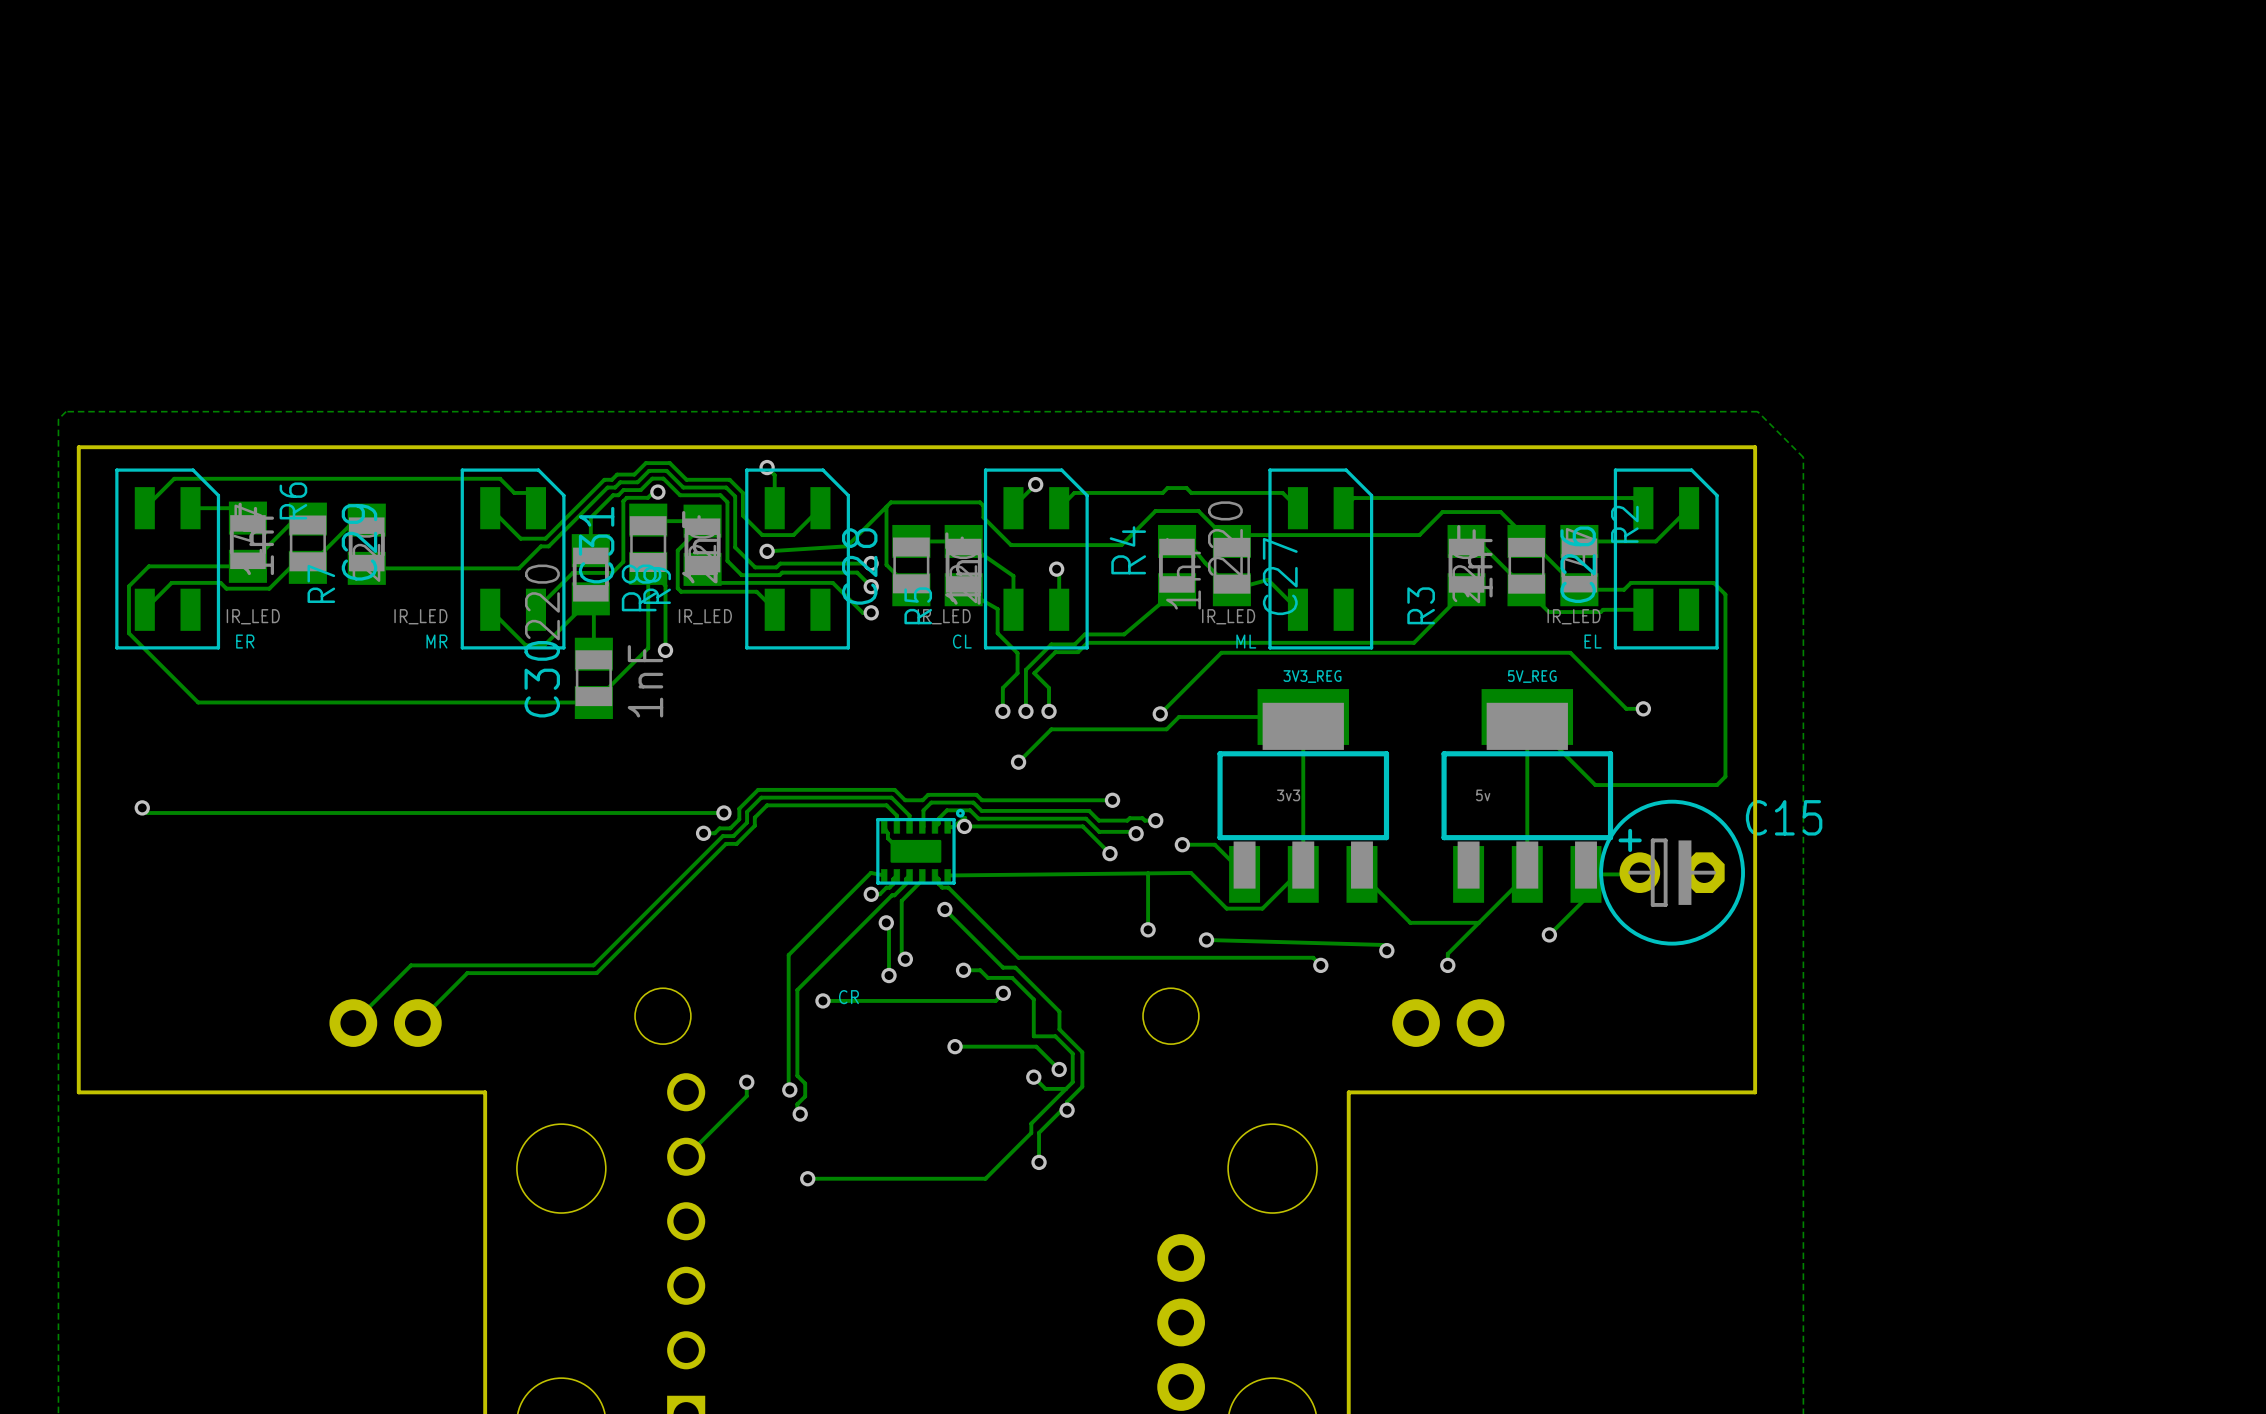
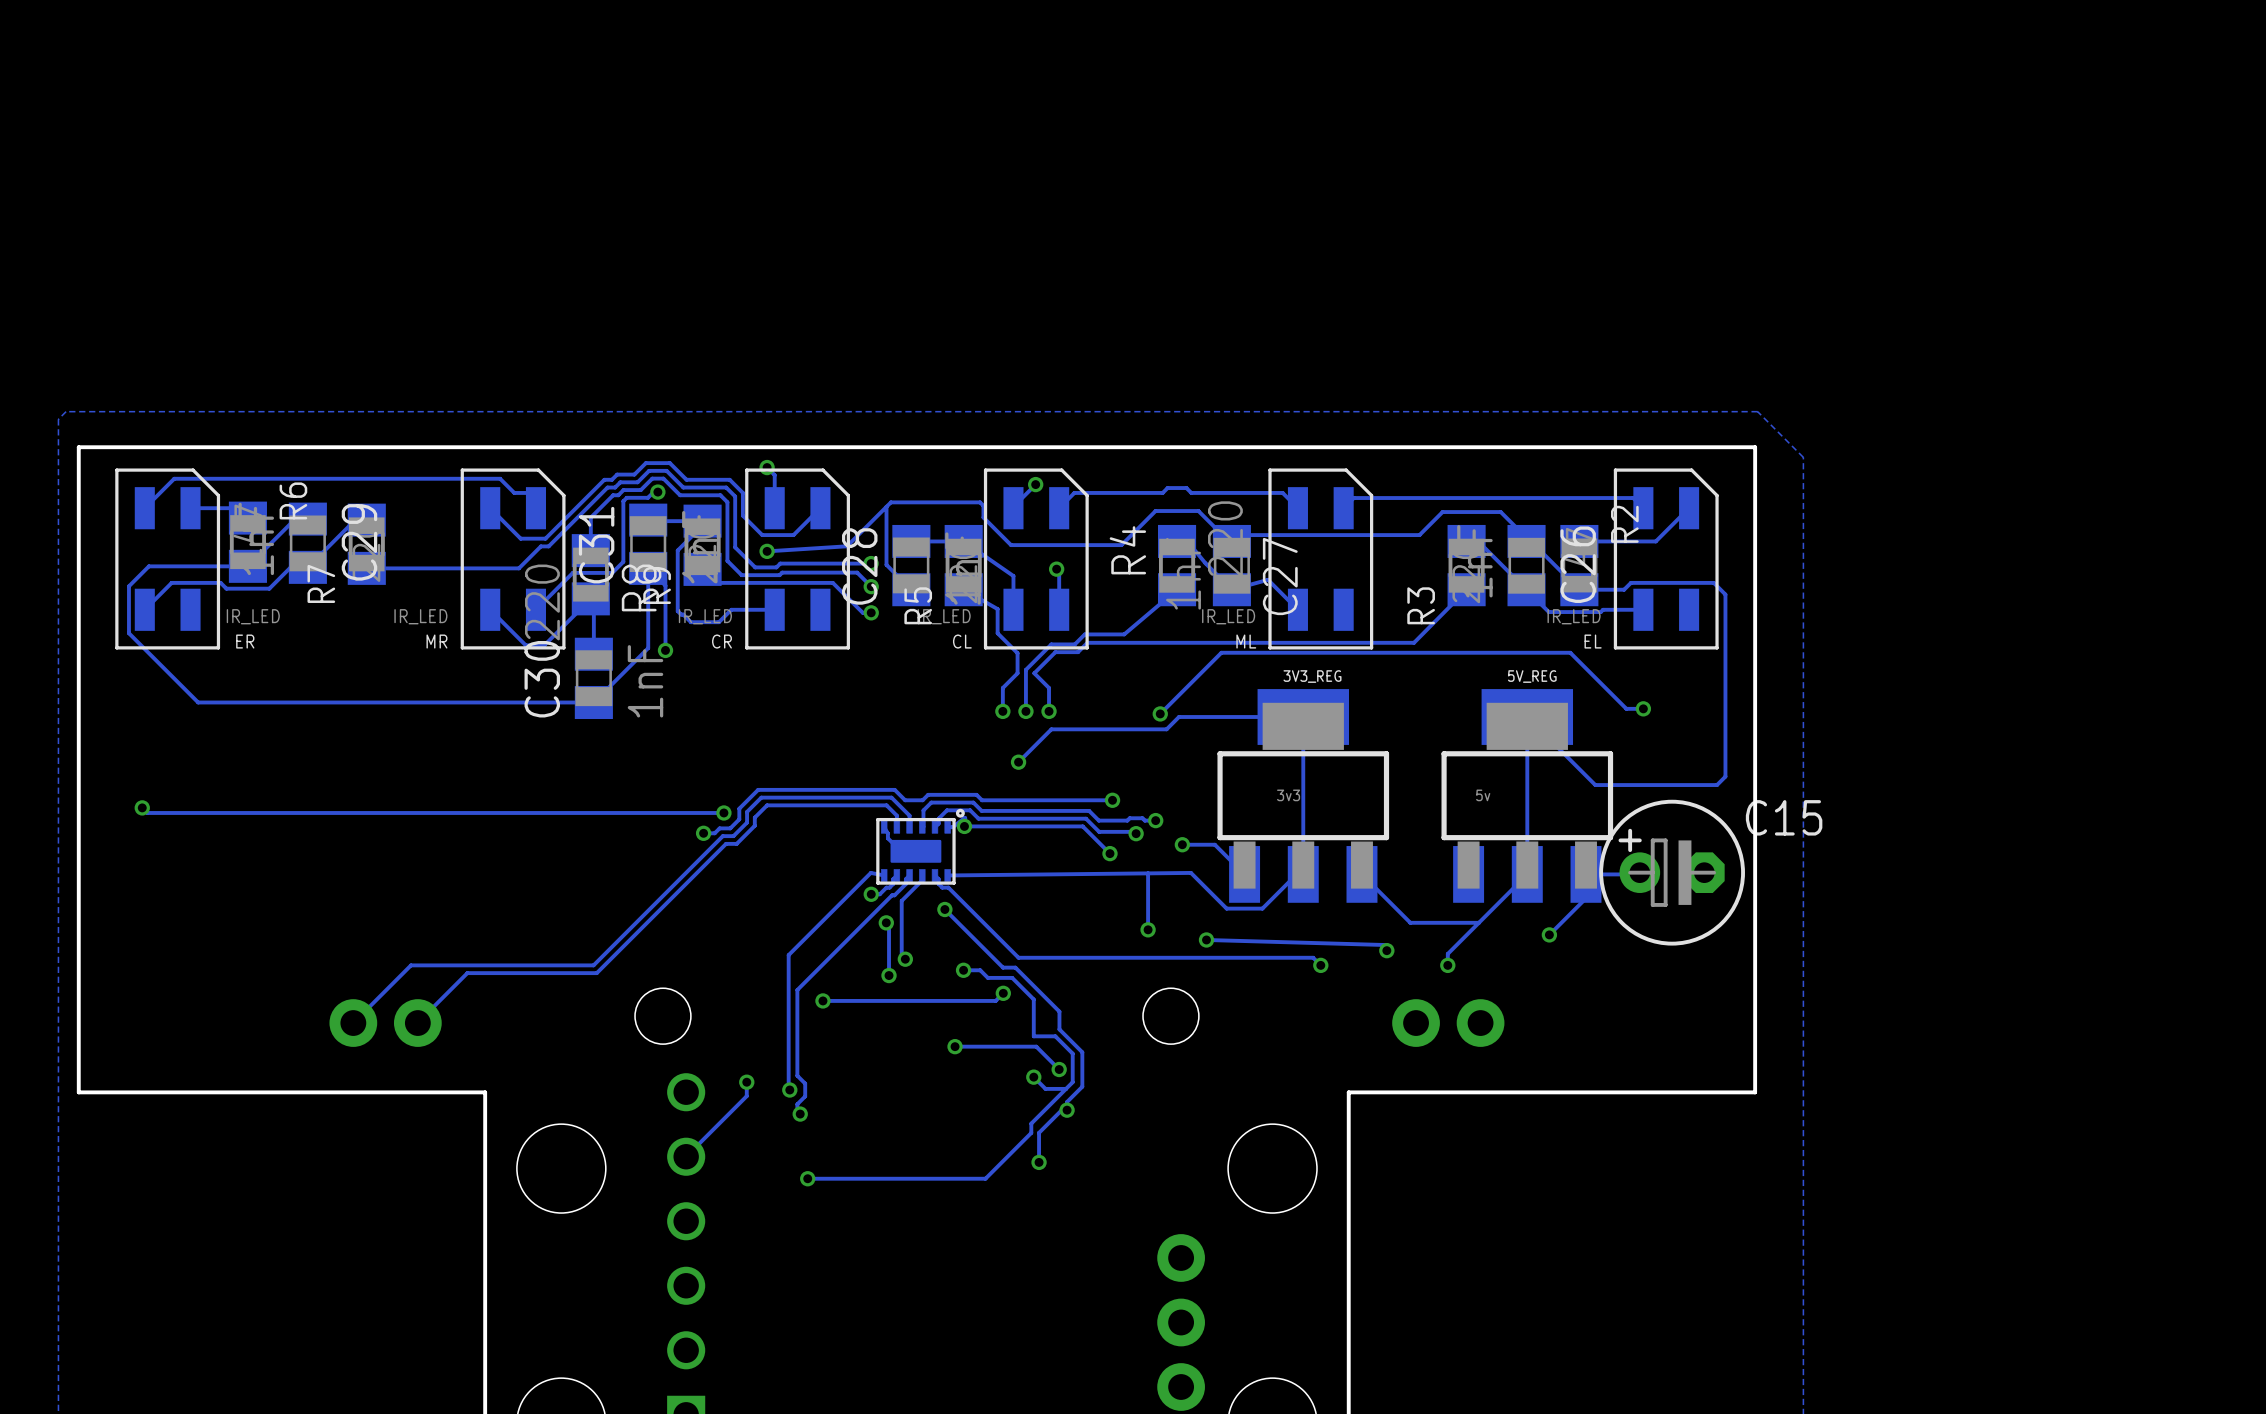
track: (677, 588) (681, 591) (756, 591) (774, 609) -> (677, 588) (677, 611) (690, 622) (718, 622) (731, 609) (774, 609)
CR name position: CR (848, 997) -> CR (721, 641)

